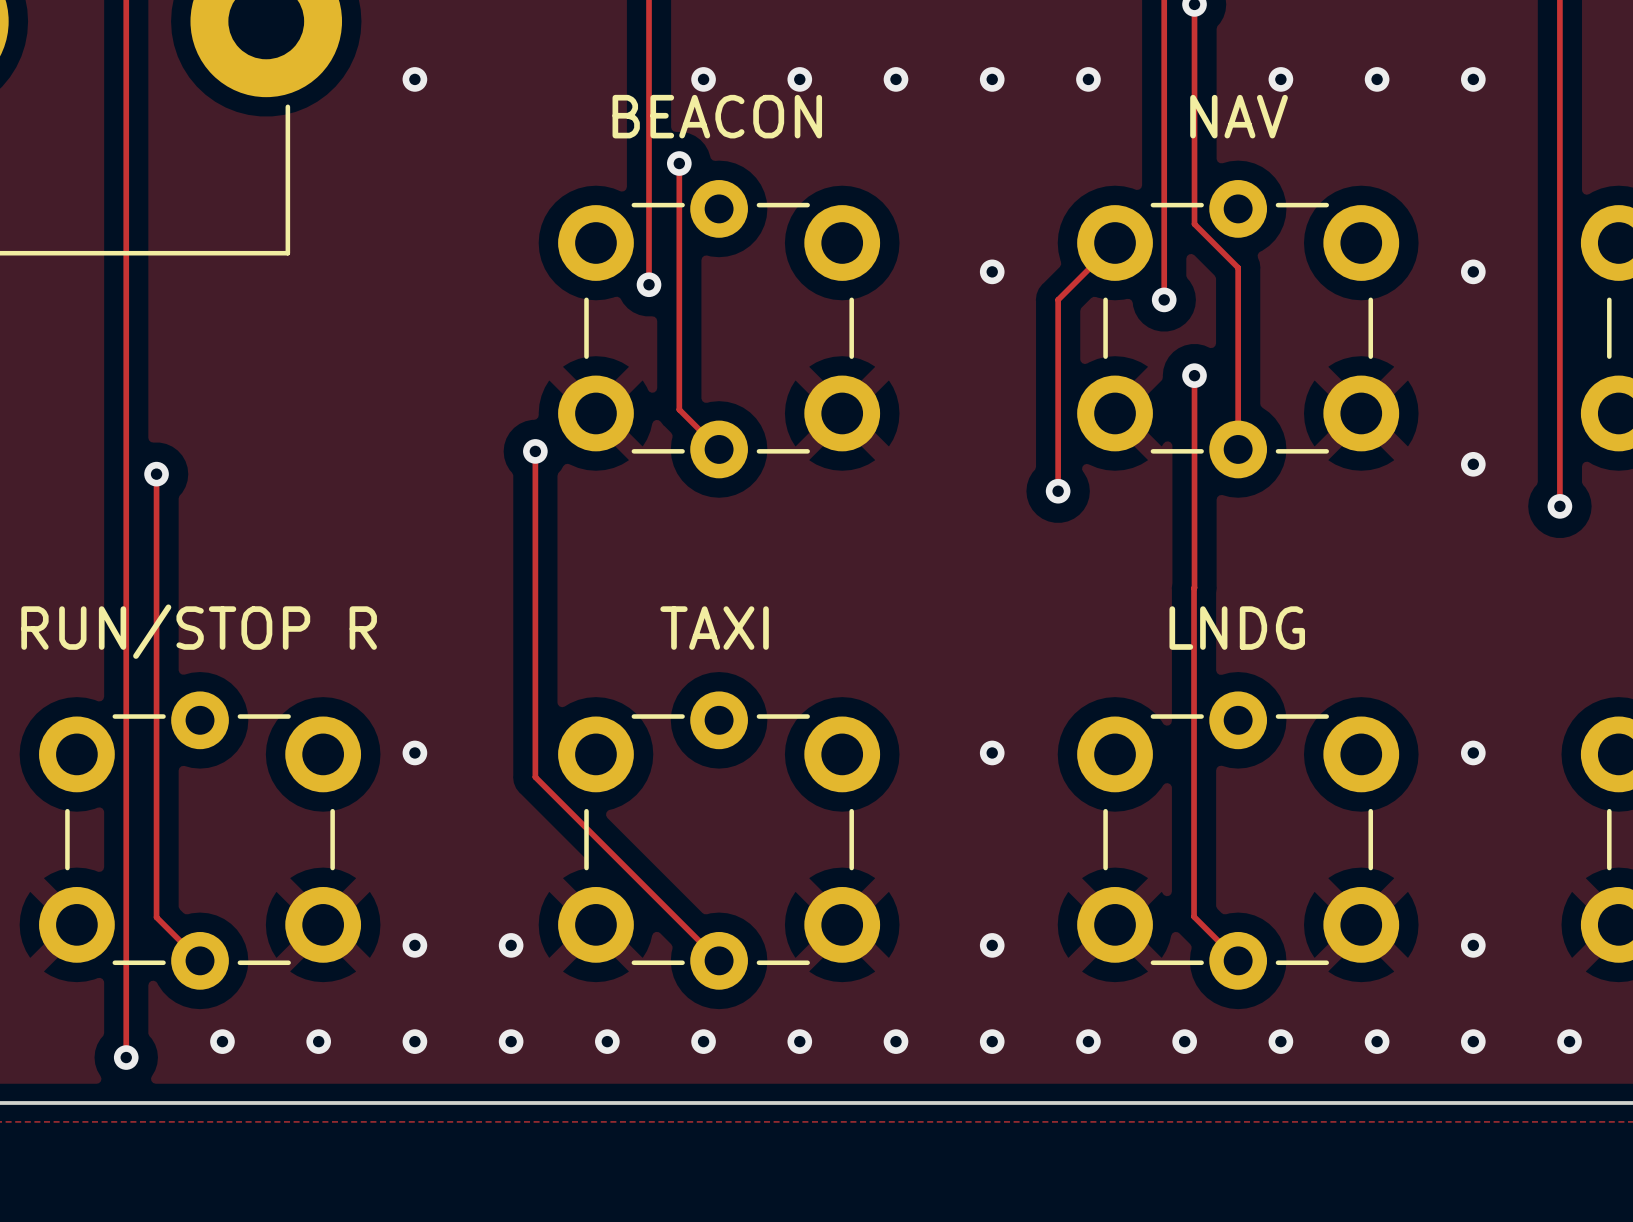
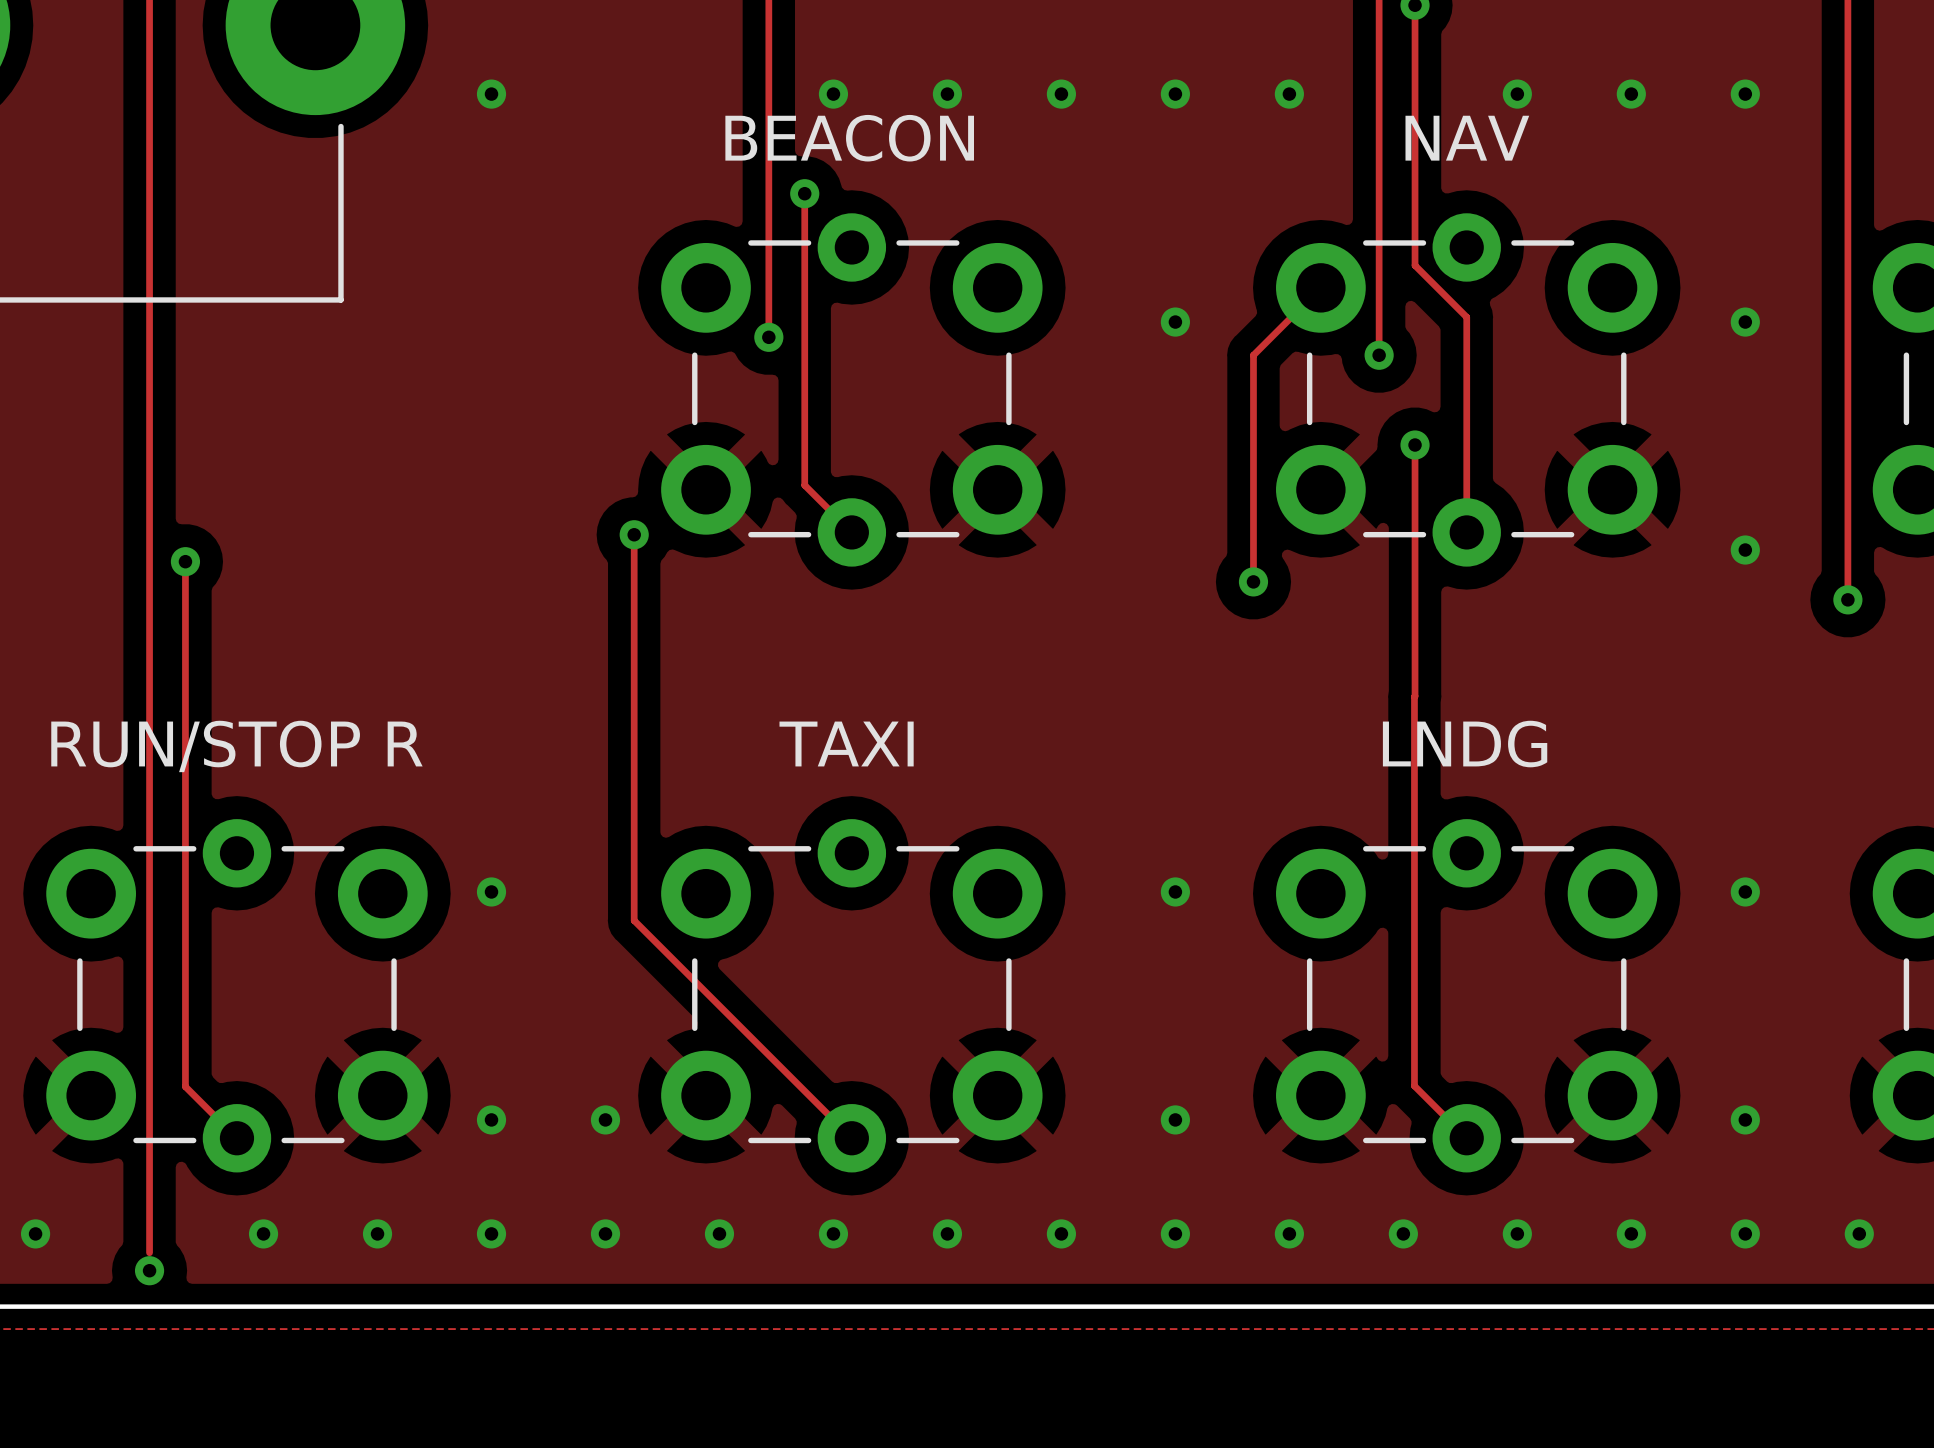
via: none -> (35, 1233)
via position: (126, 1057) -> (149, 1270)

